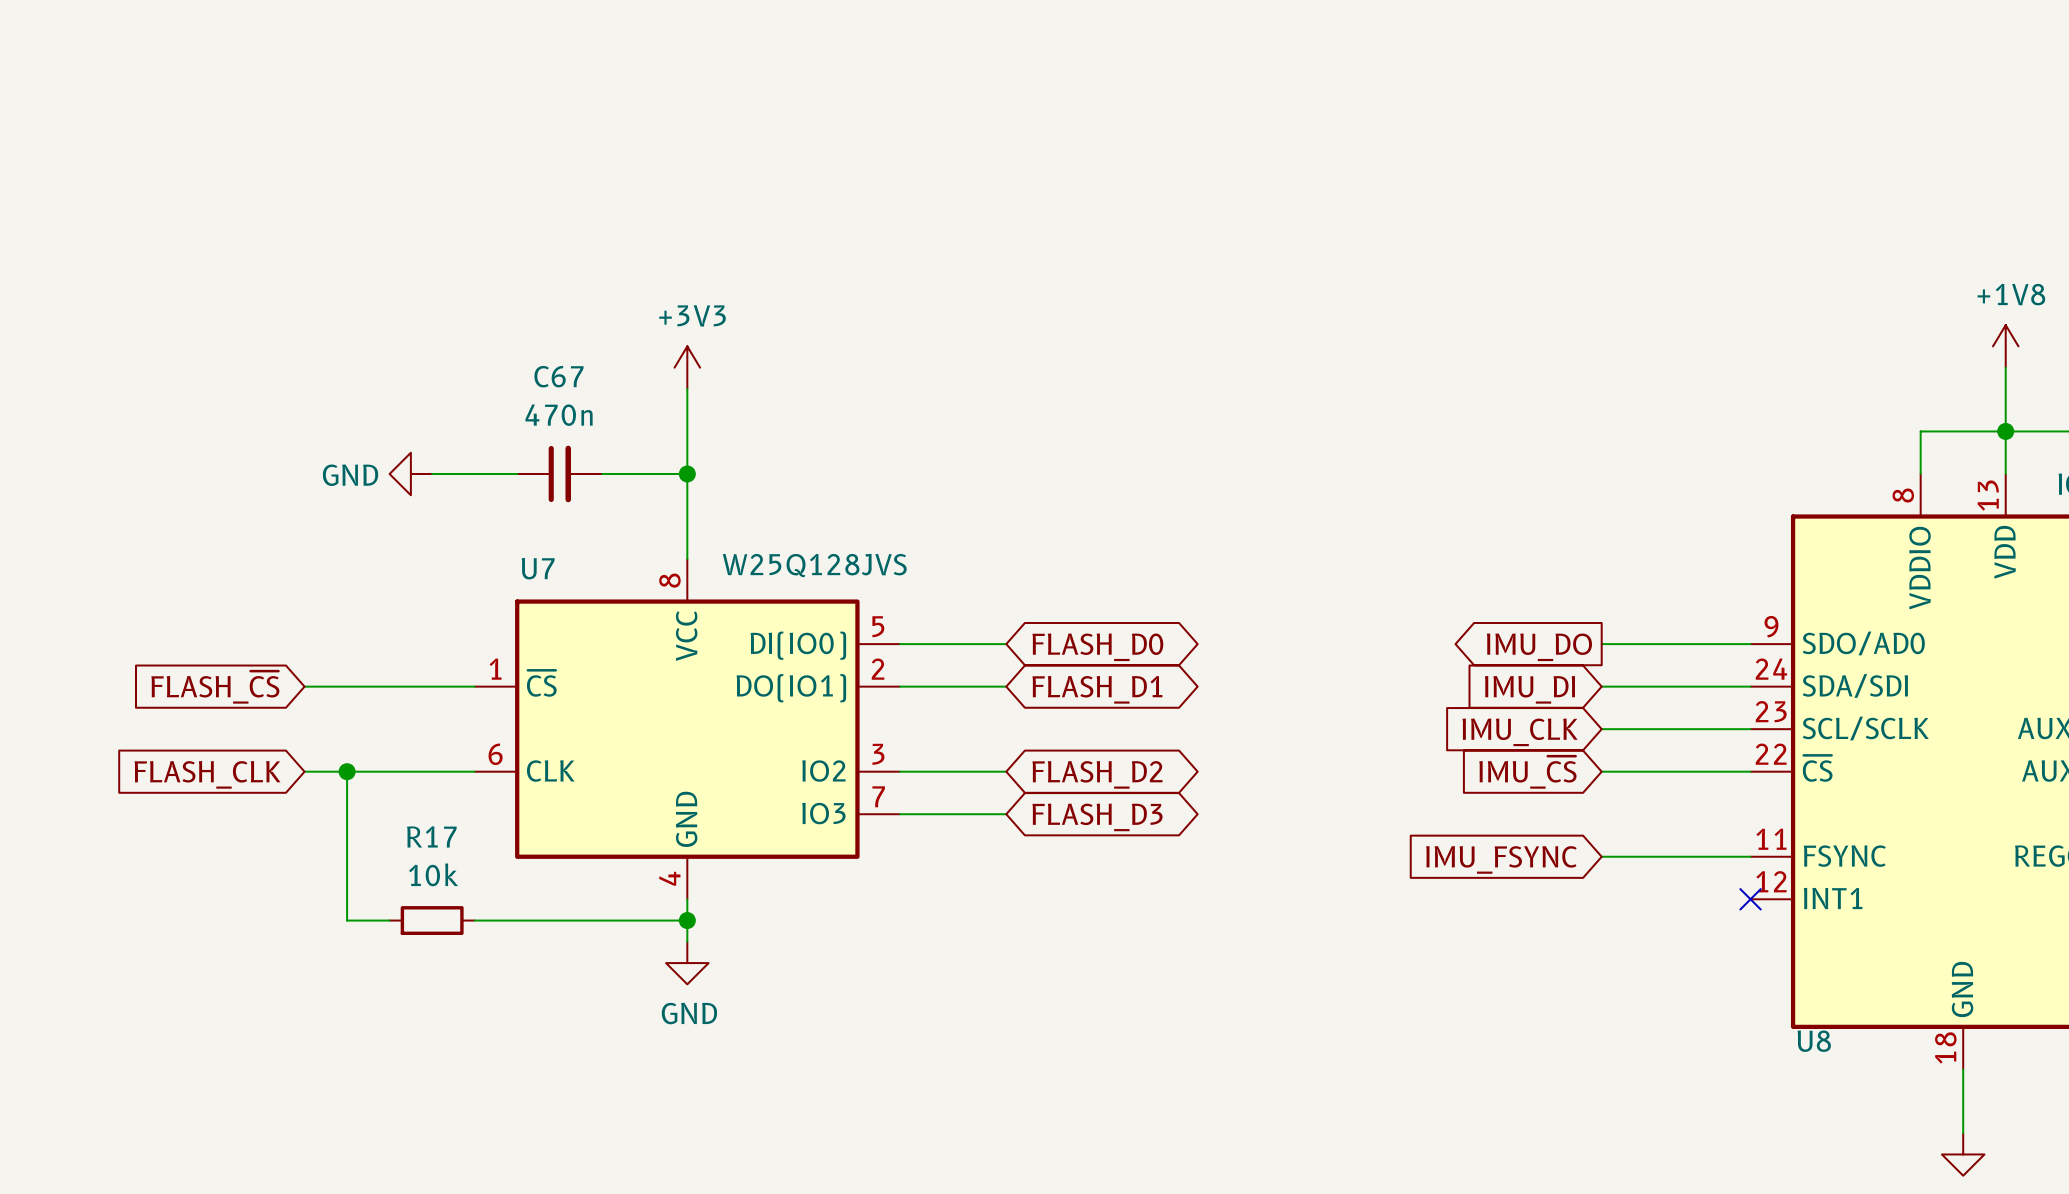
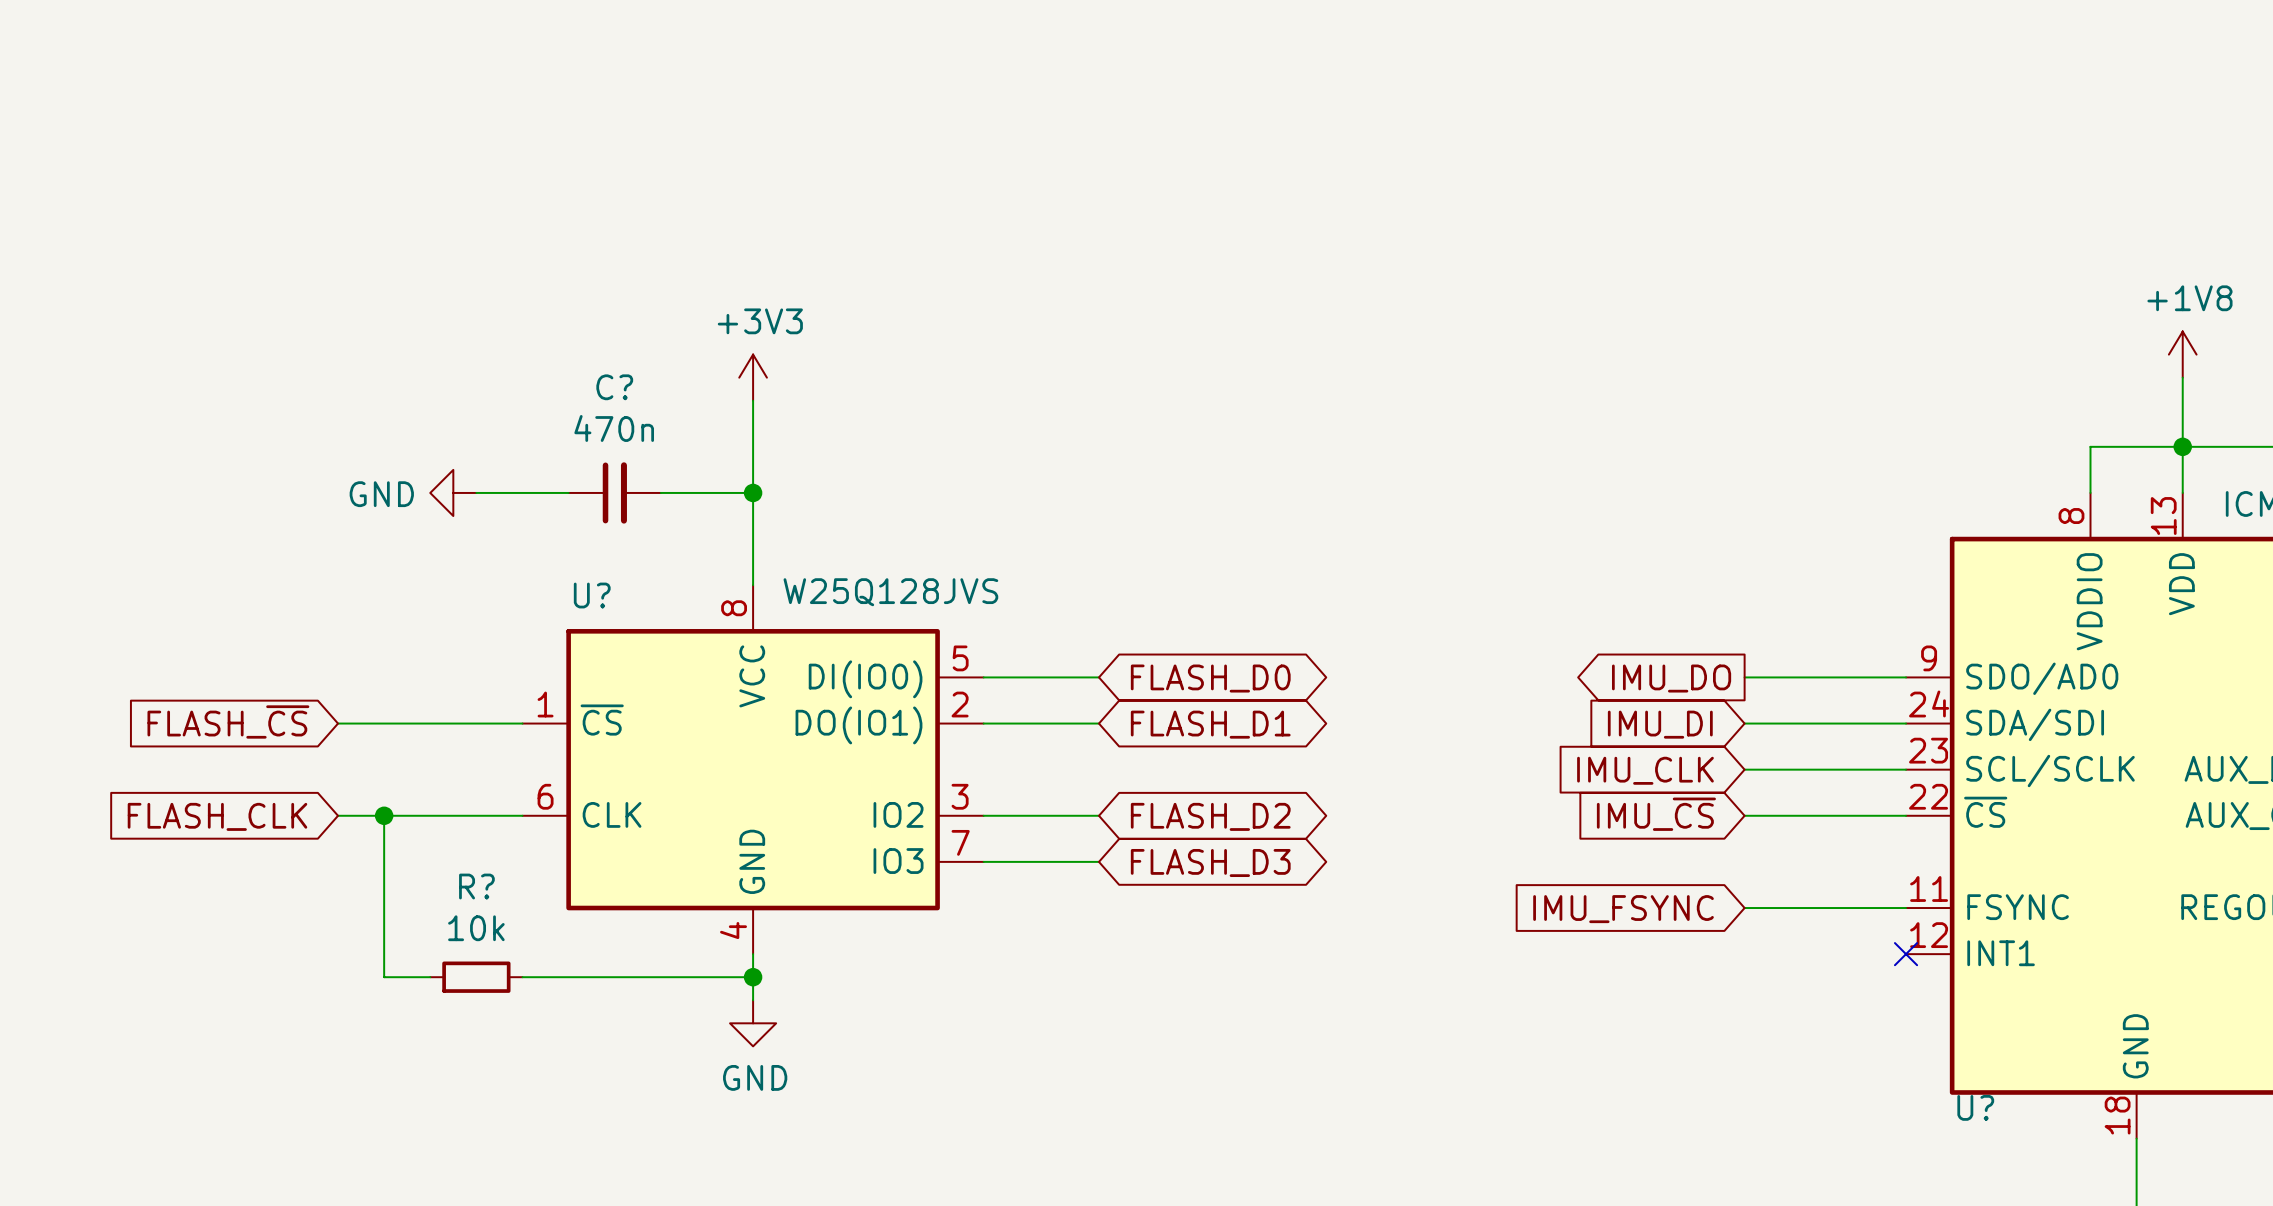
C67 name: C67 (558, 376) -> C? (614, 387)
U7 name: U7 (538, 568) -> U? (592, 595)
R17 name: R17 (431, 836) -> R? (476, 886)
U8 name: U8 (1814, 1041) -> U? (1975, 1107)

